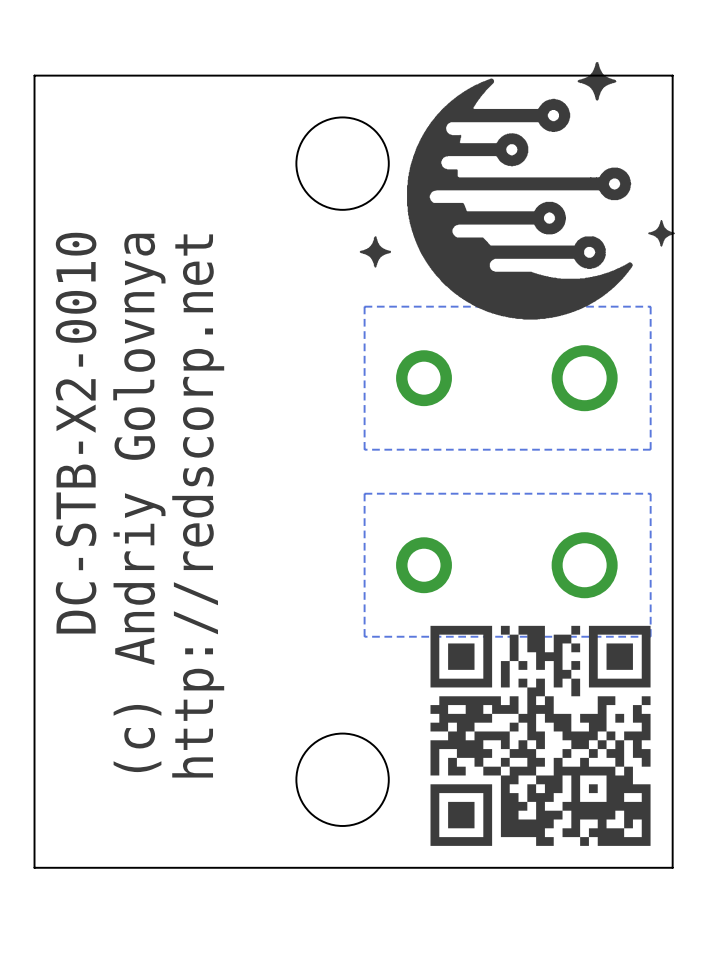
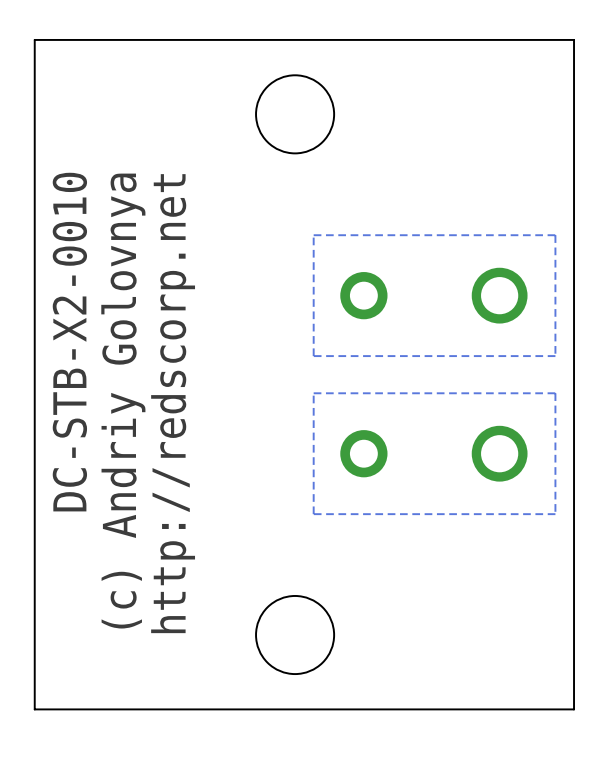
drawing: [359, 62, 675, 320] -> none
drawing: [430, 625, 651, 846] -> none

